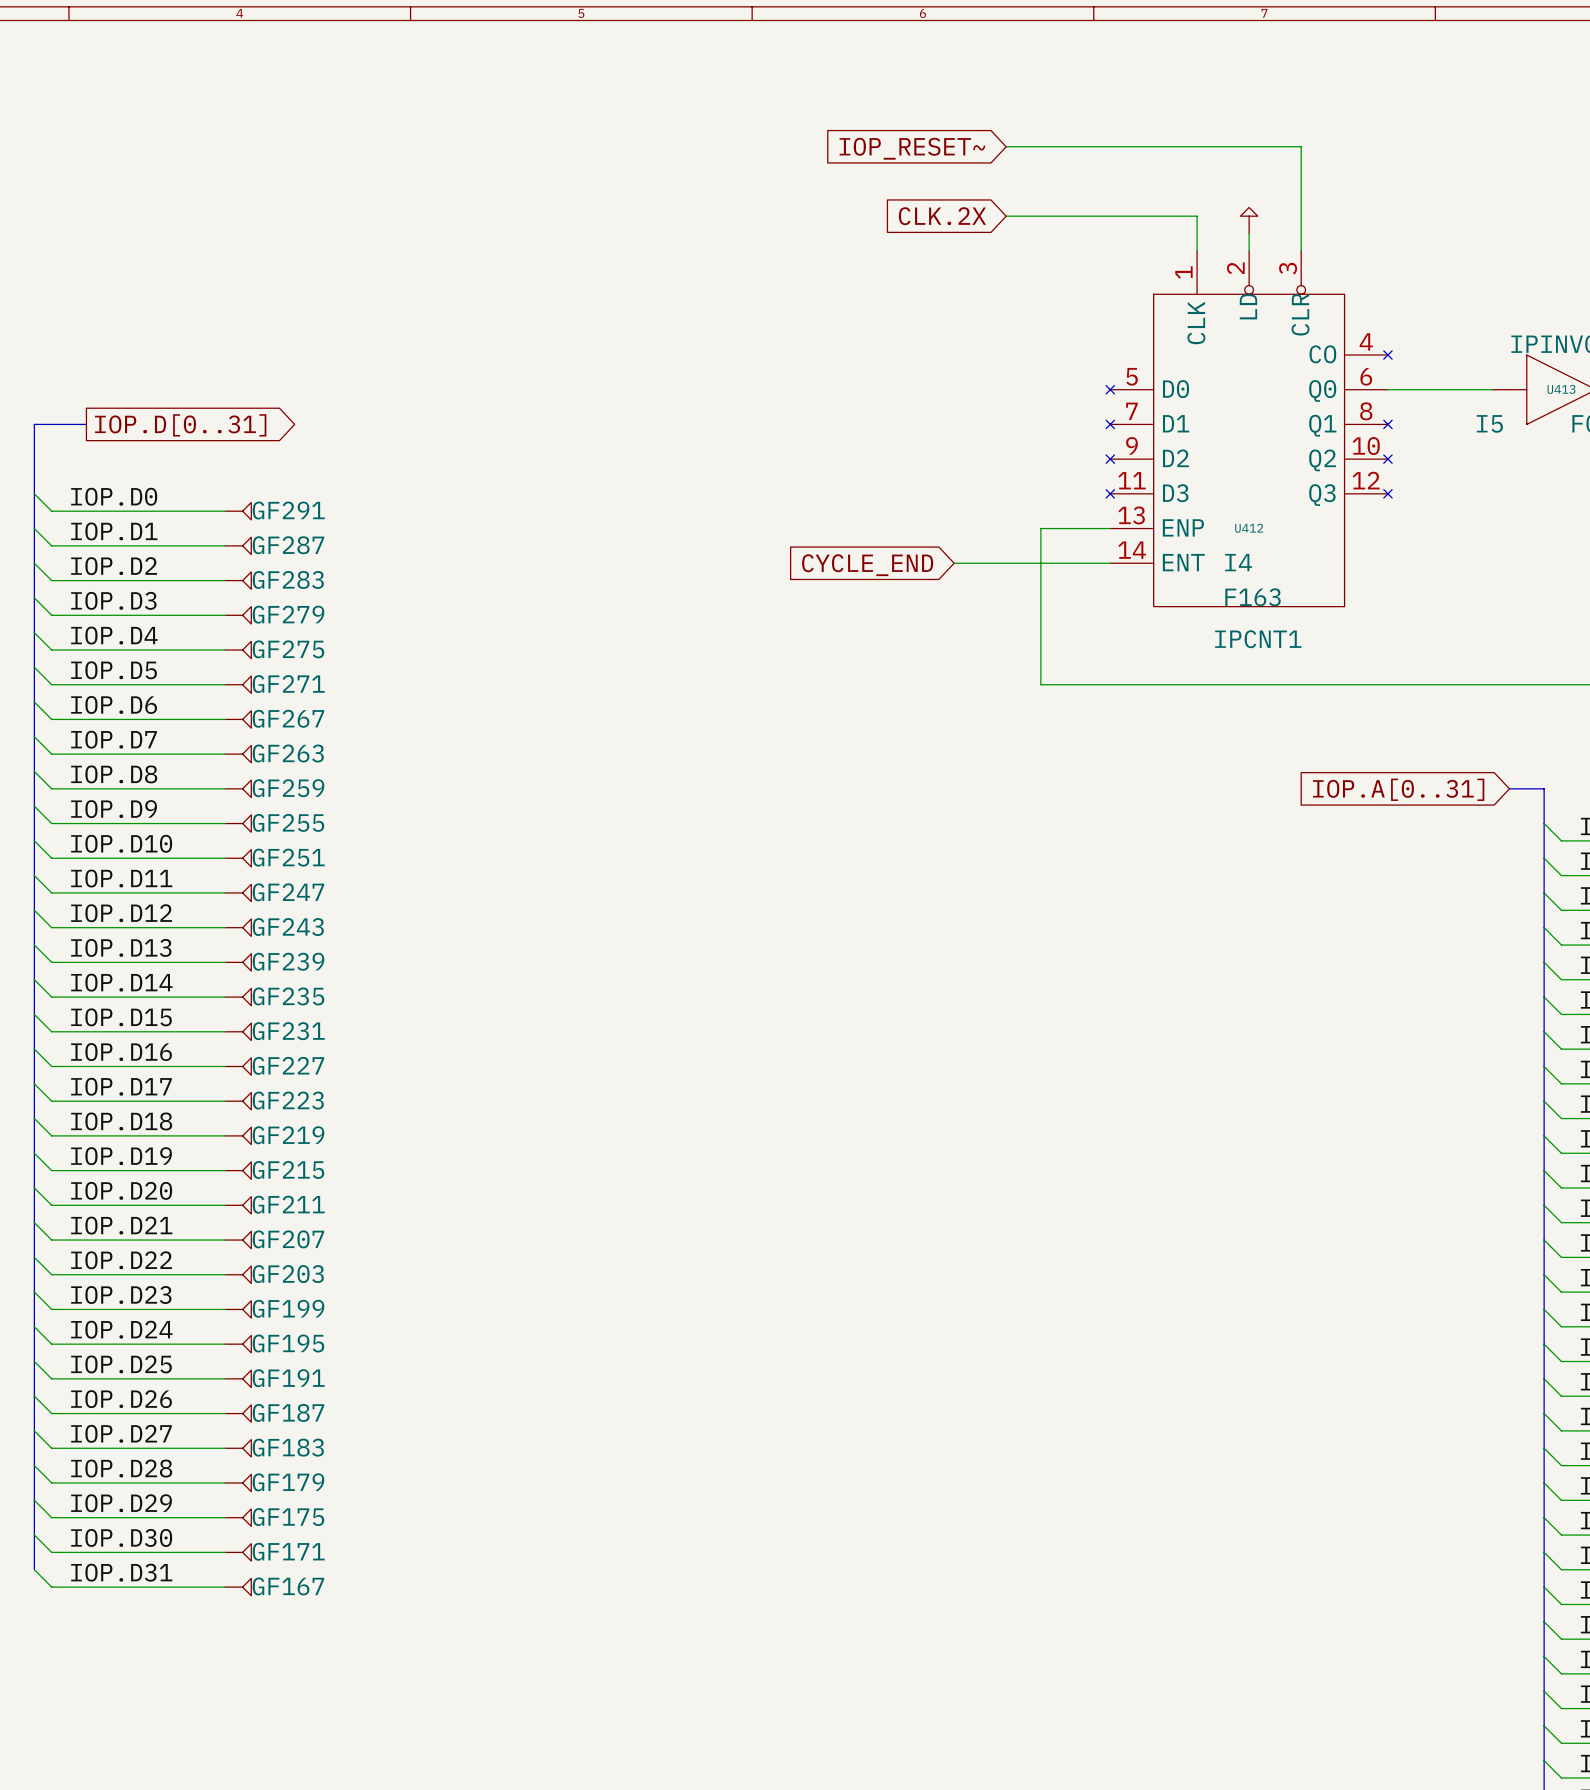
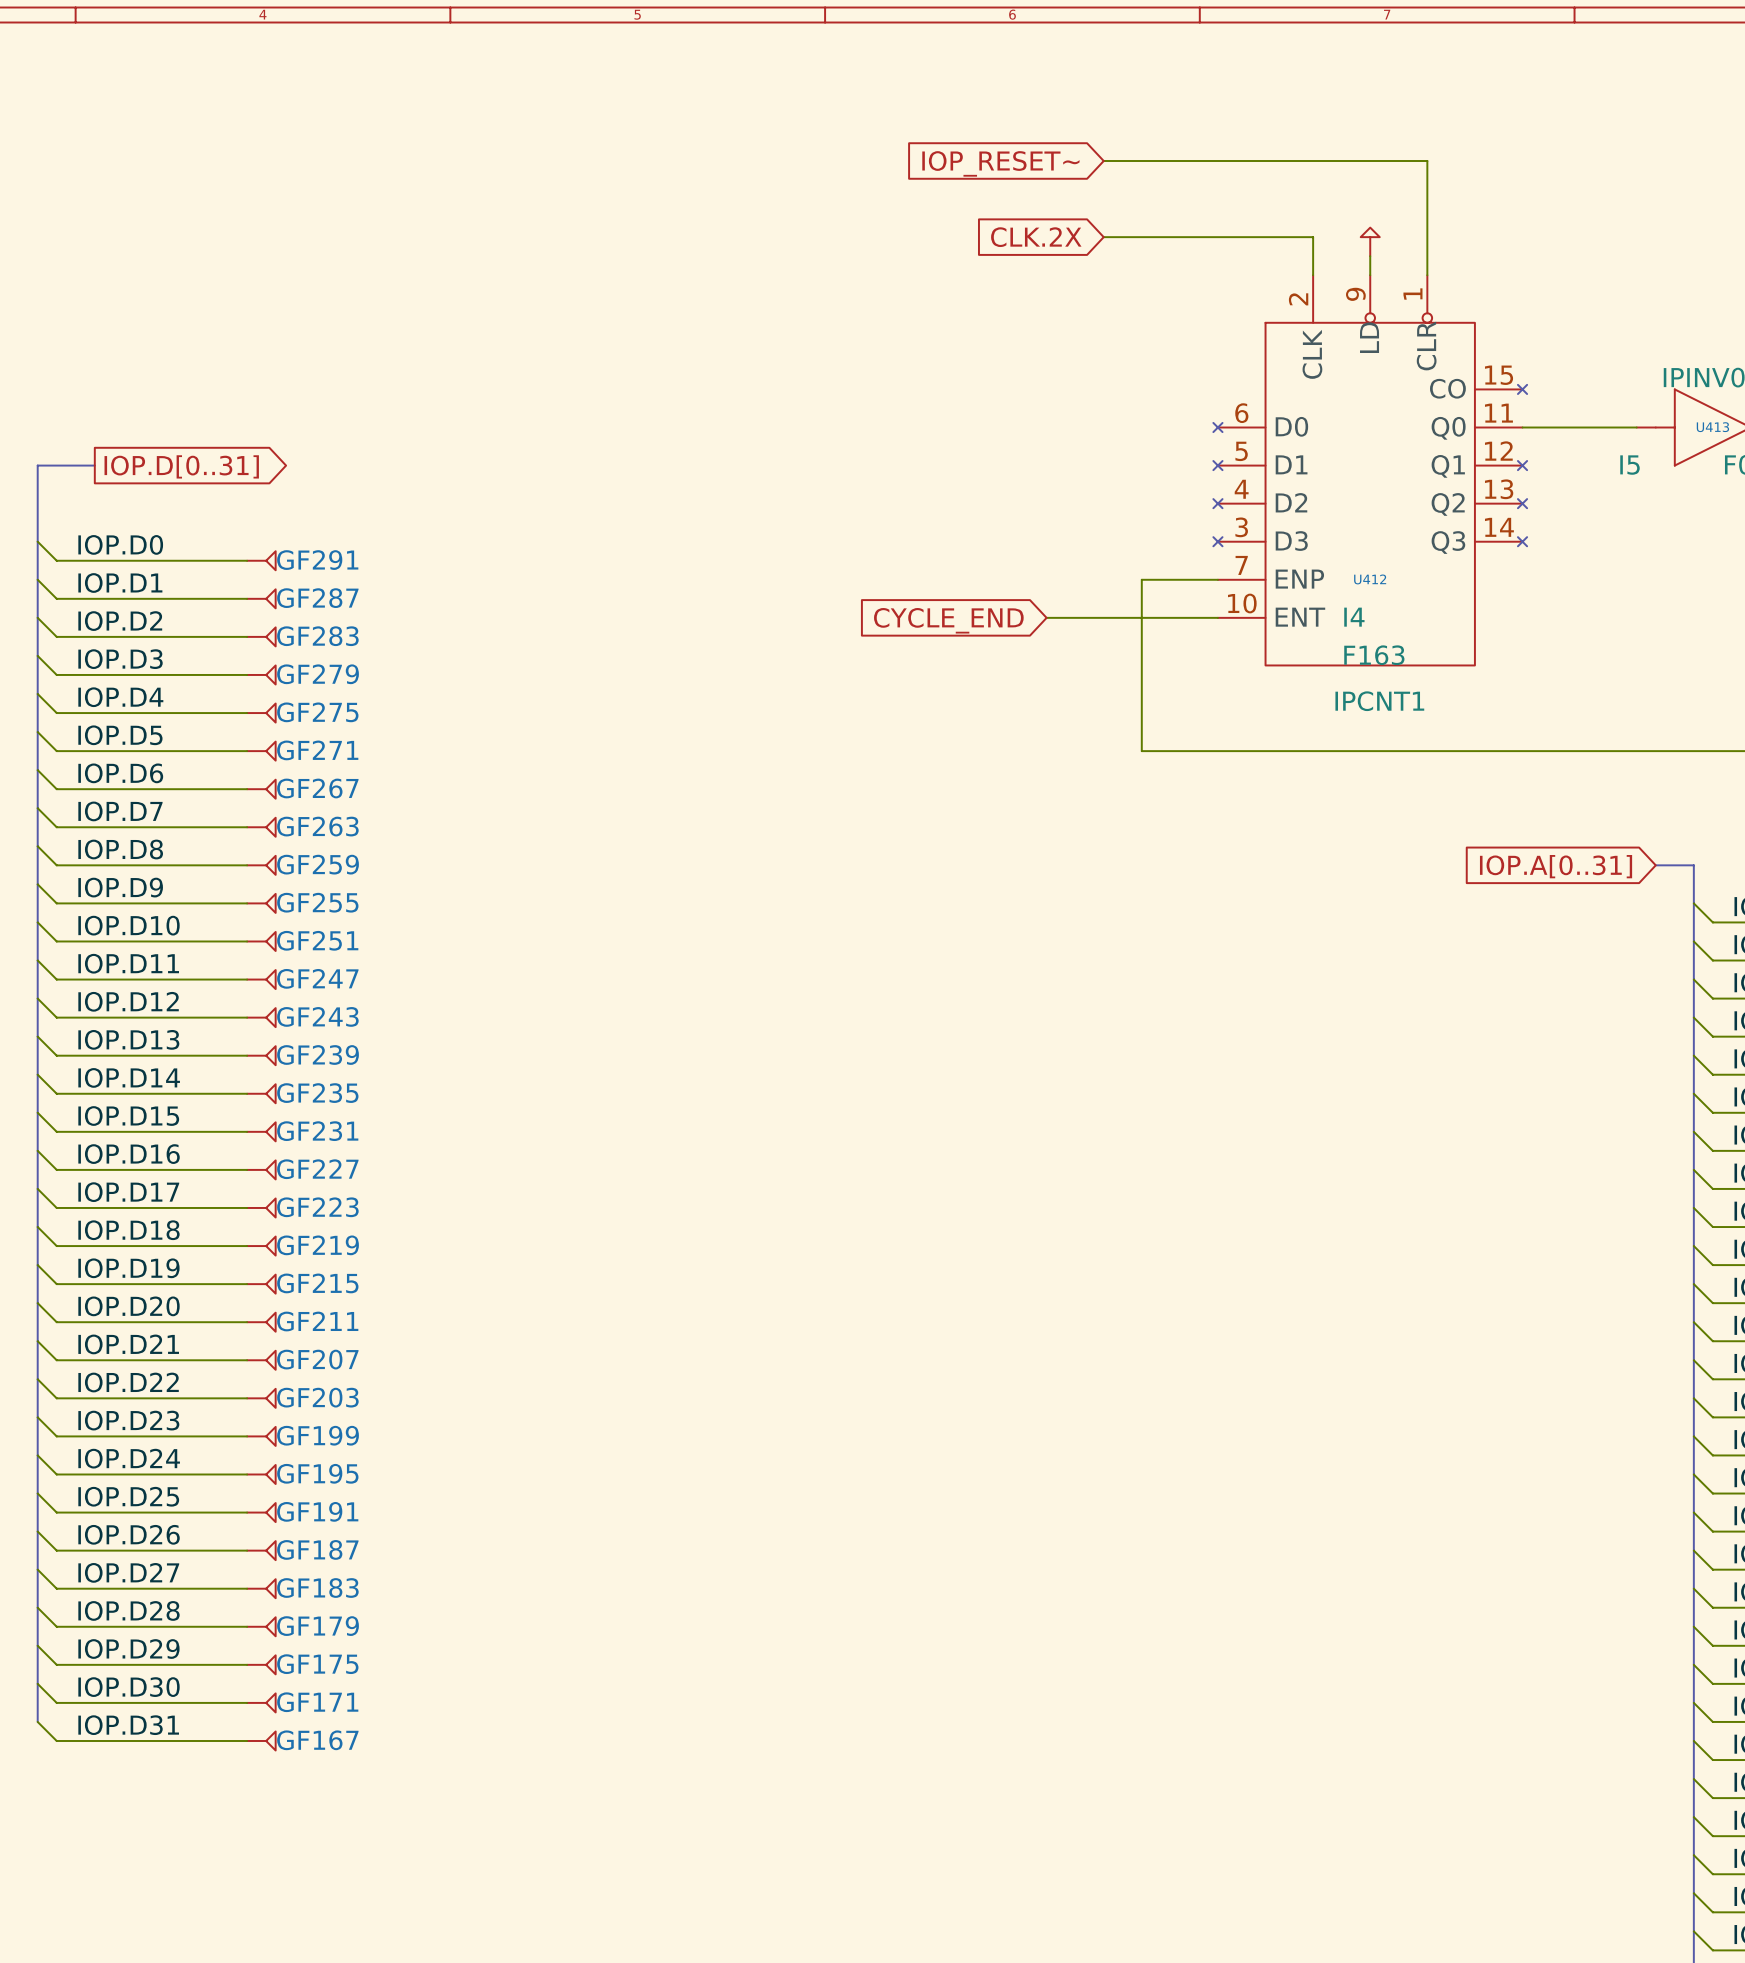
U412 symbol: [1110, 250, 1388, 607] -> [1217, 275, 1523, 666]

